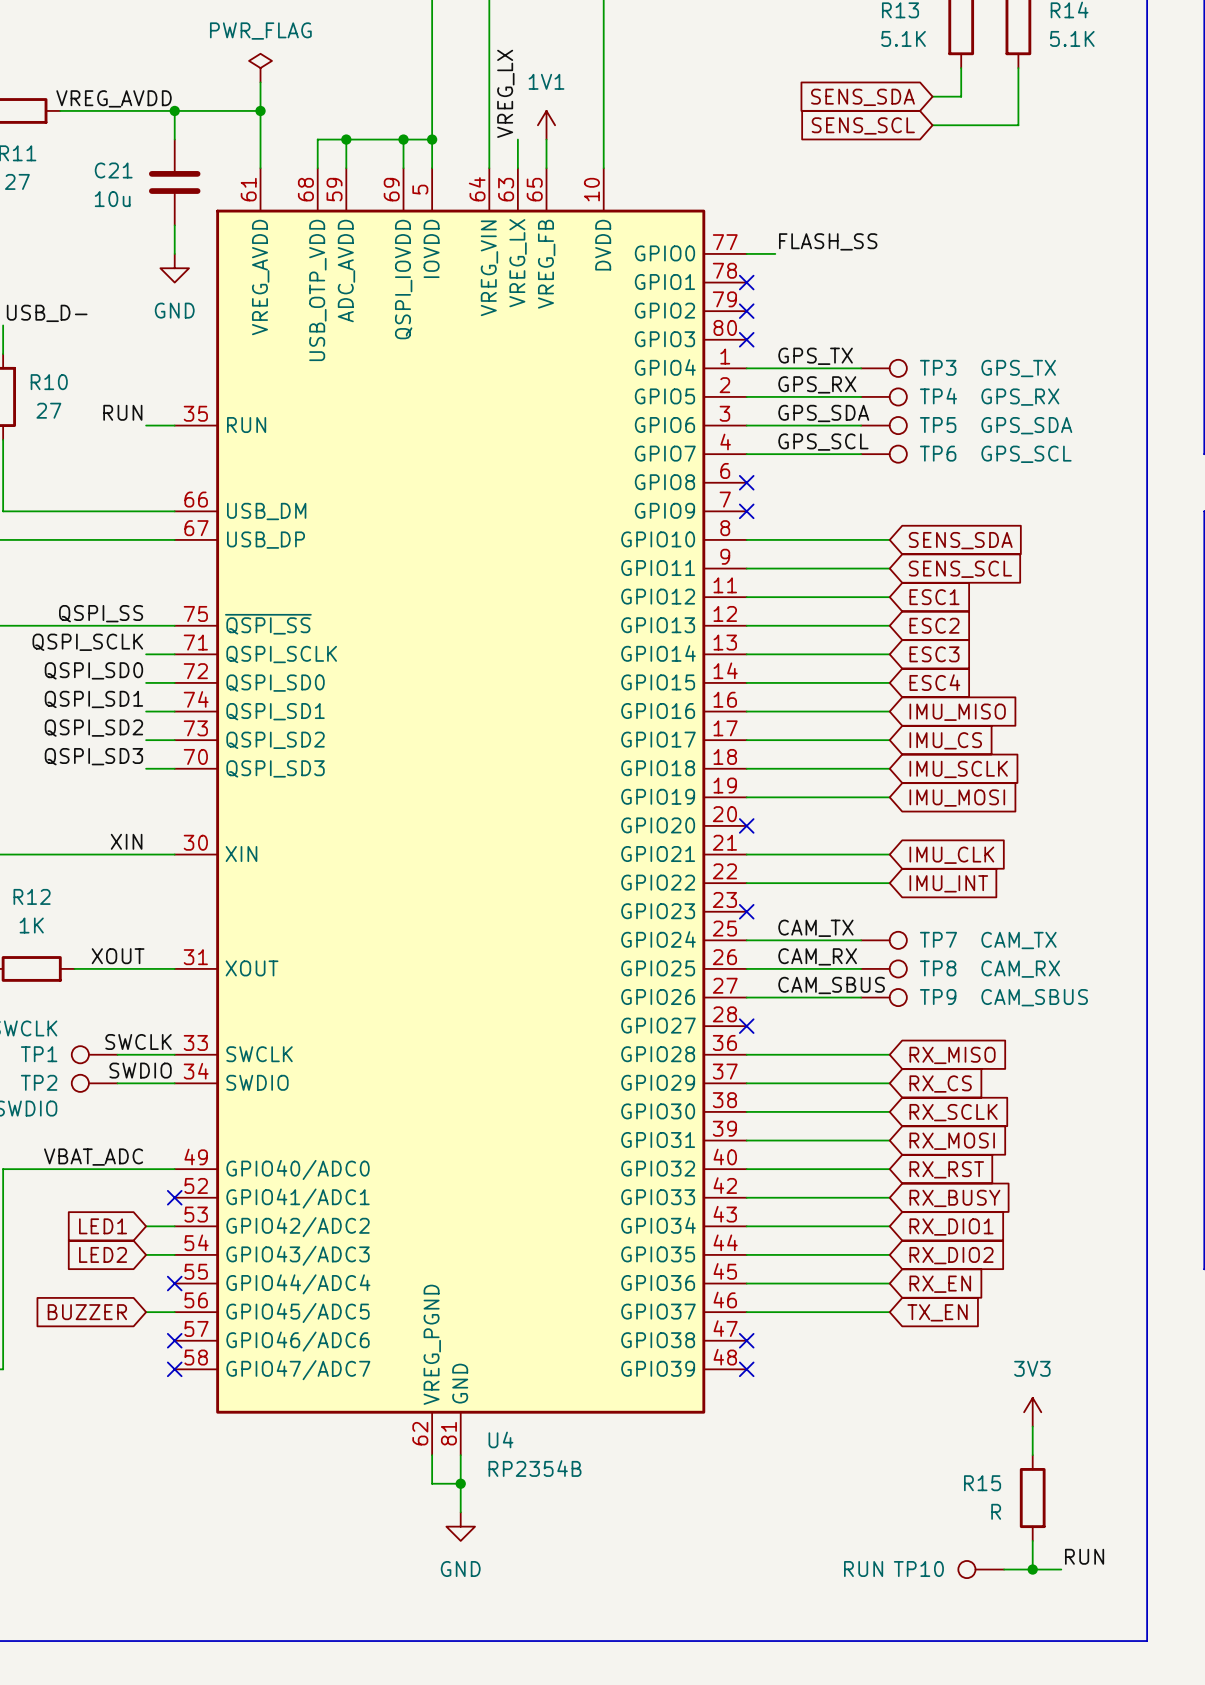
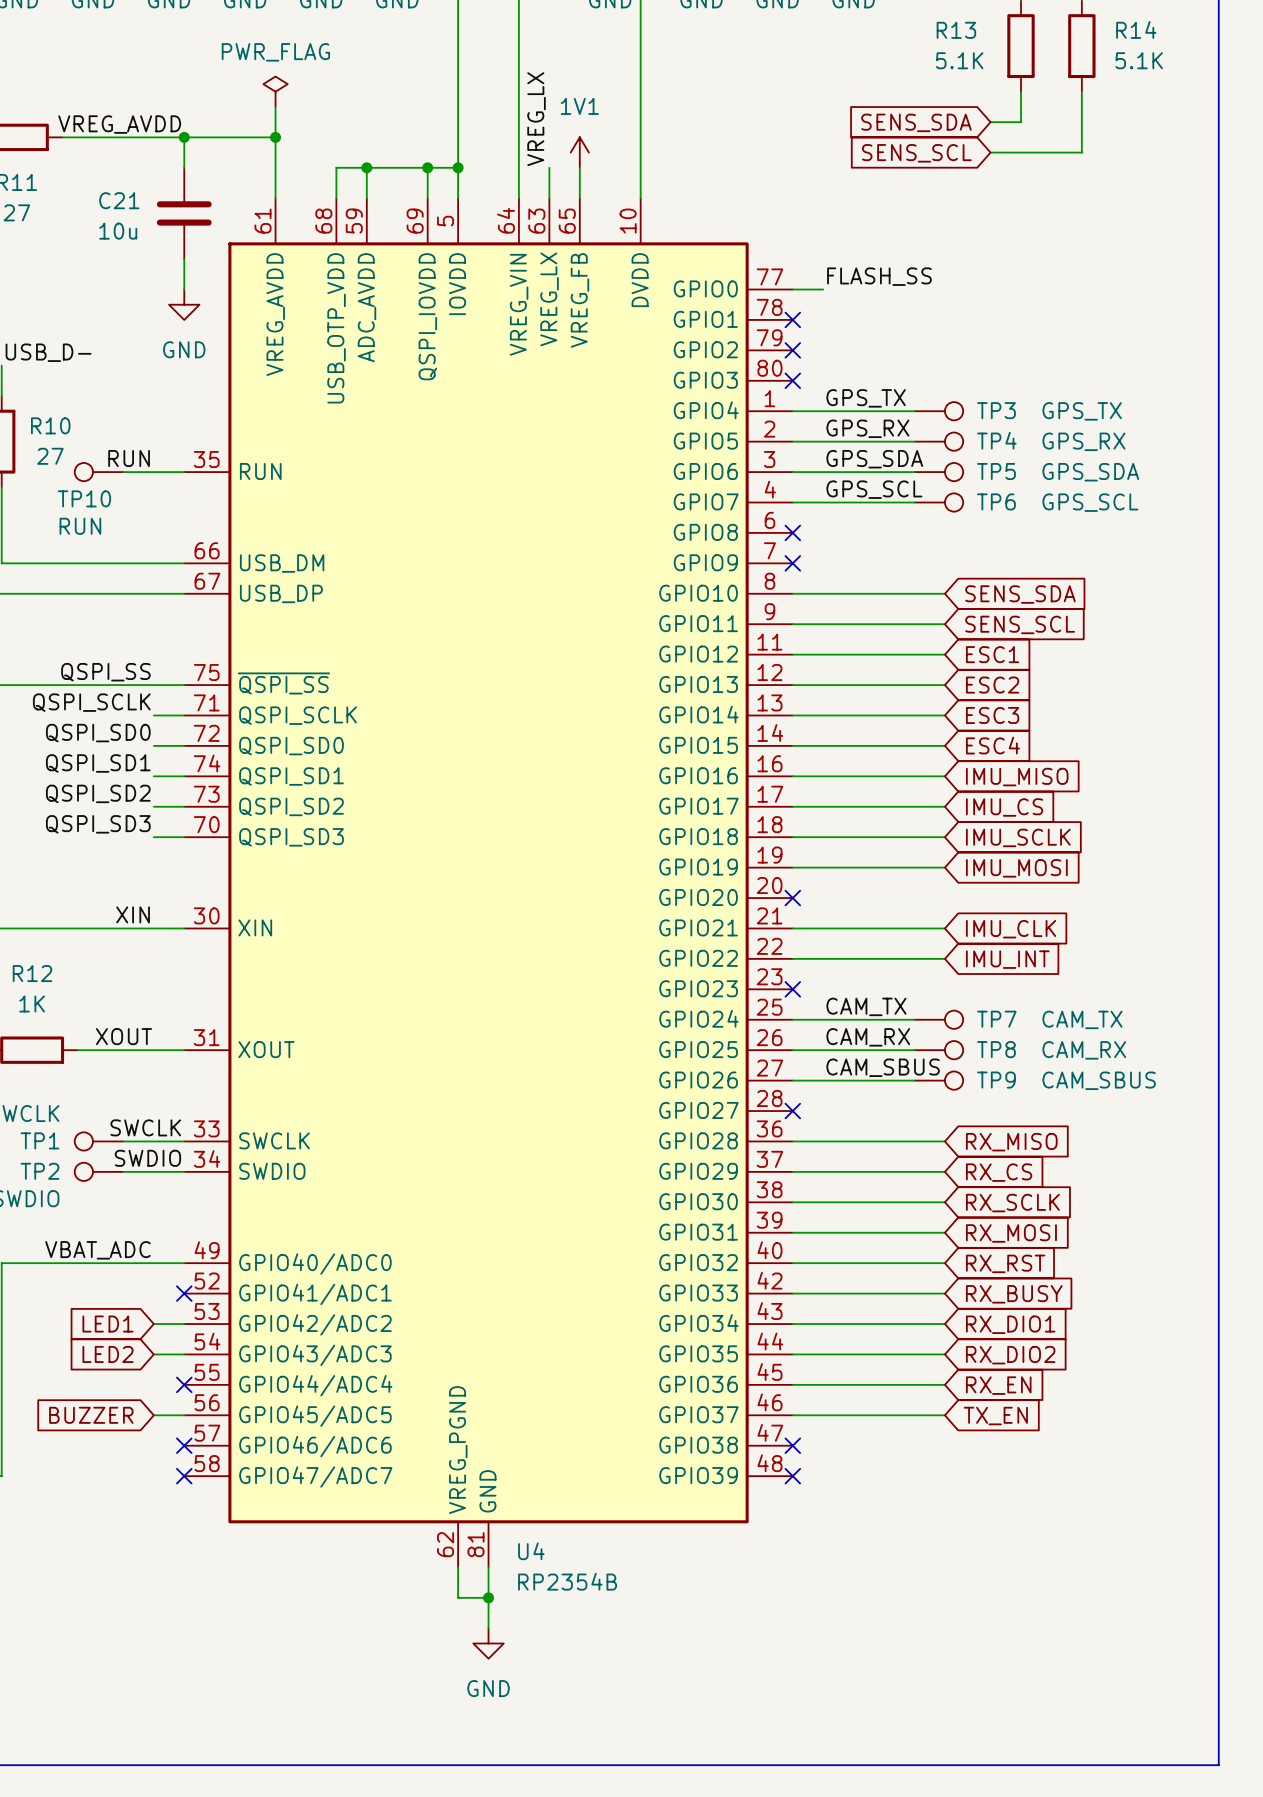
wire: none -> (123, 472) (153, 472)
power symbol: 3V3 (1032, 1412) -> none
wire: (1032, 1426) (1032, 1455) -> none
R15: R (1032, 1498) -> none
wire: (1032, 1540) (1032, 1569) -> none
label: RUN (1084, 1556) -> none
TP10 value position: RUN (863, 1569) -> RUN (80, 526)
TP10 name position: TP10 (918, 1569) -> TP10 (84, 498)
TP10 position: (981, 1569) -> (99, 472)
wire: (1004, 1569) (1061, 1569) -> none
junction: (1032, 1569) -> none

